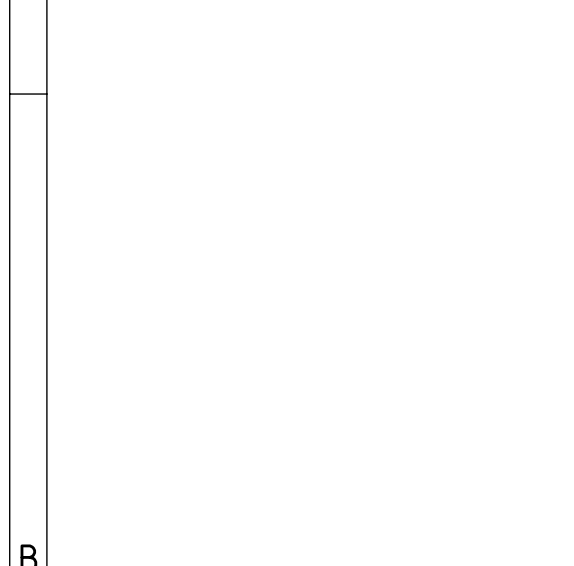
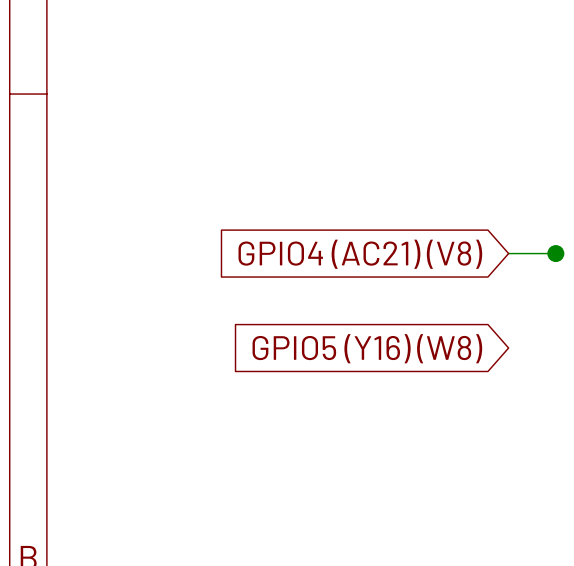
wire: none -> (508, 253) (555, 253)
junction: none -> (555, 253)
global label: none -> GPIO4 (AC21) (V8) (360, 254)
global label: none -> GPIO5 (Y16) (W8) (367, 348)

